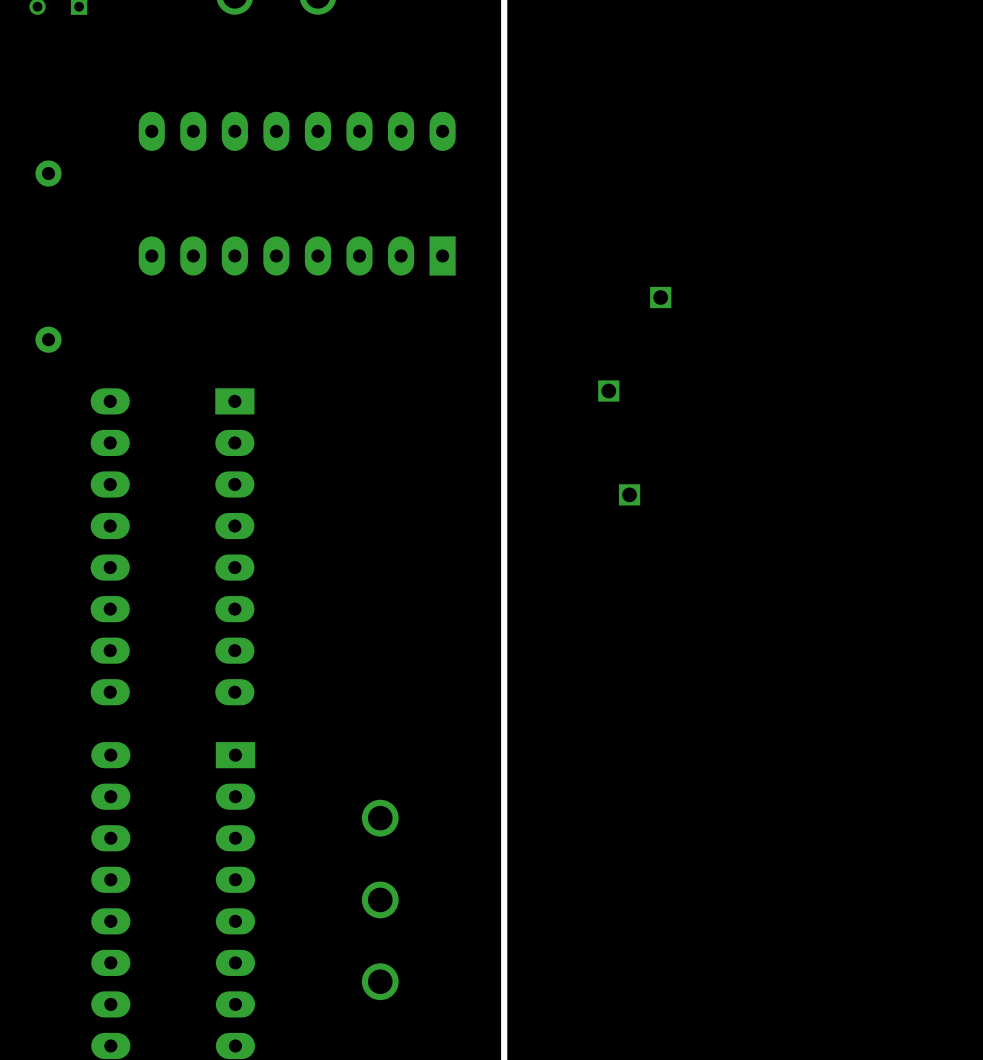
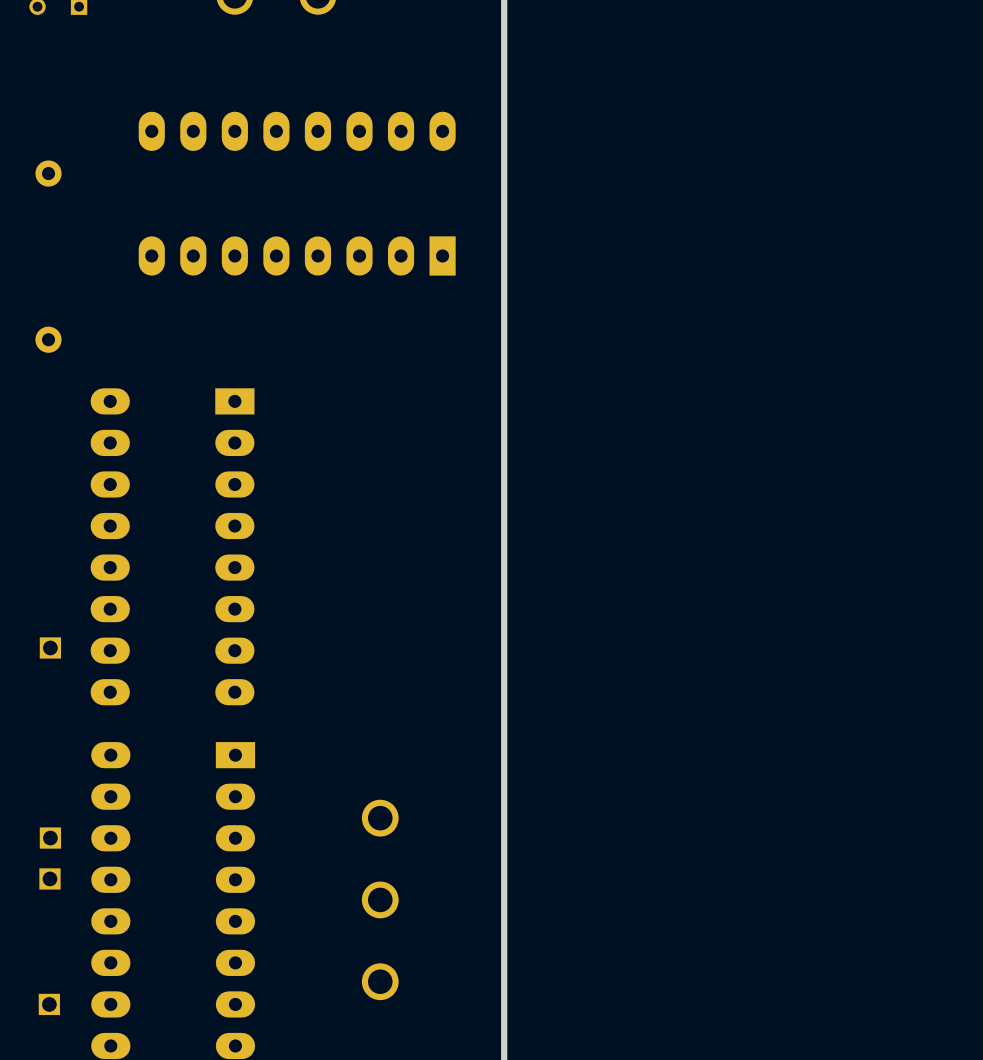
part: (660, 297) -> none
part: (608, 391) -> none
part: (629, 494) -> none
part: none -> (50, 647)
part: none -> (50, 838)
part: none -> (49, 878)
part: none -> (49, 1004)

